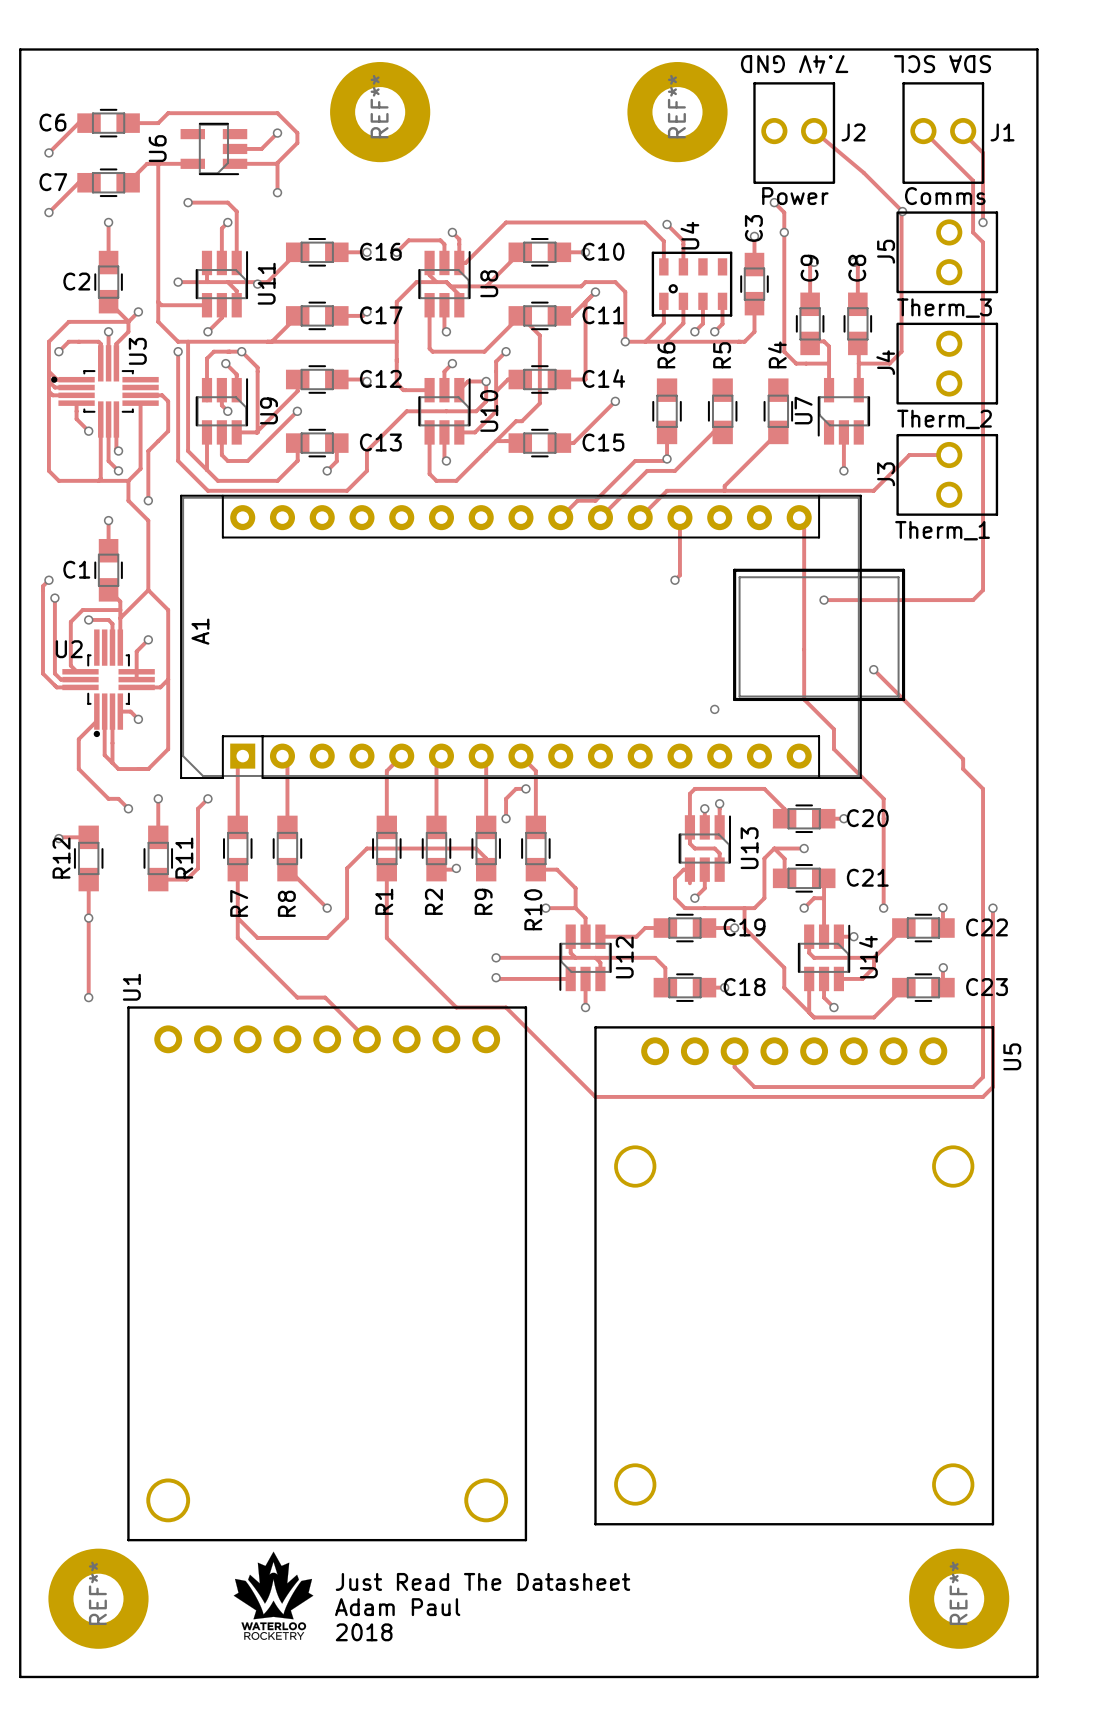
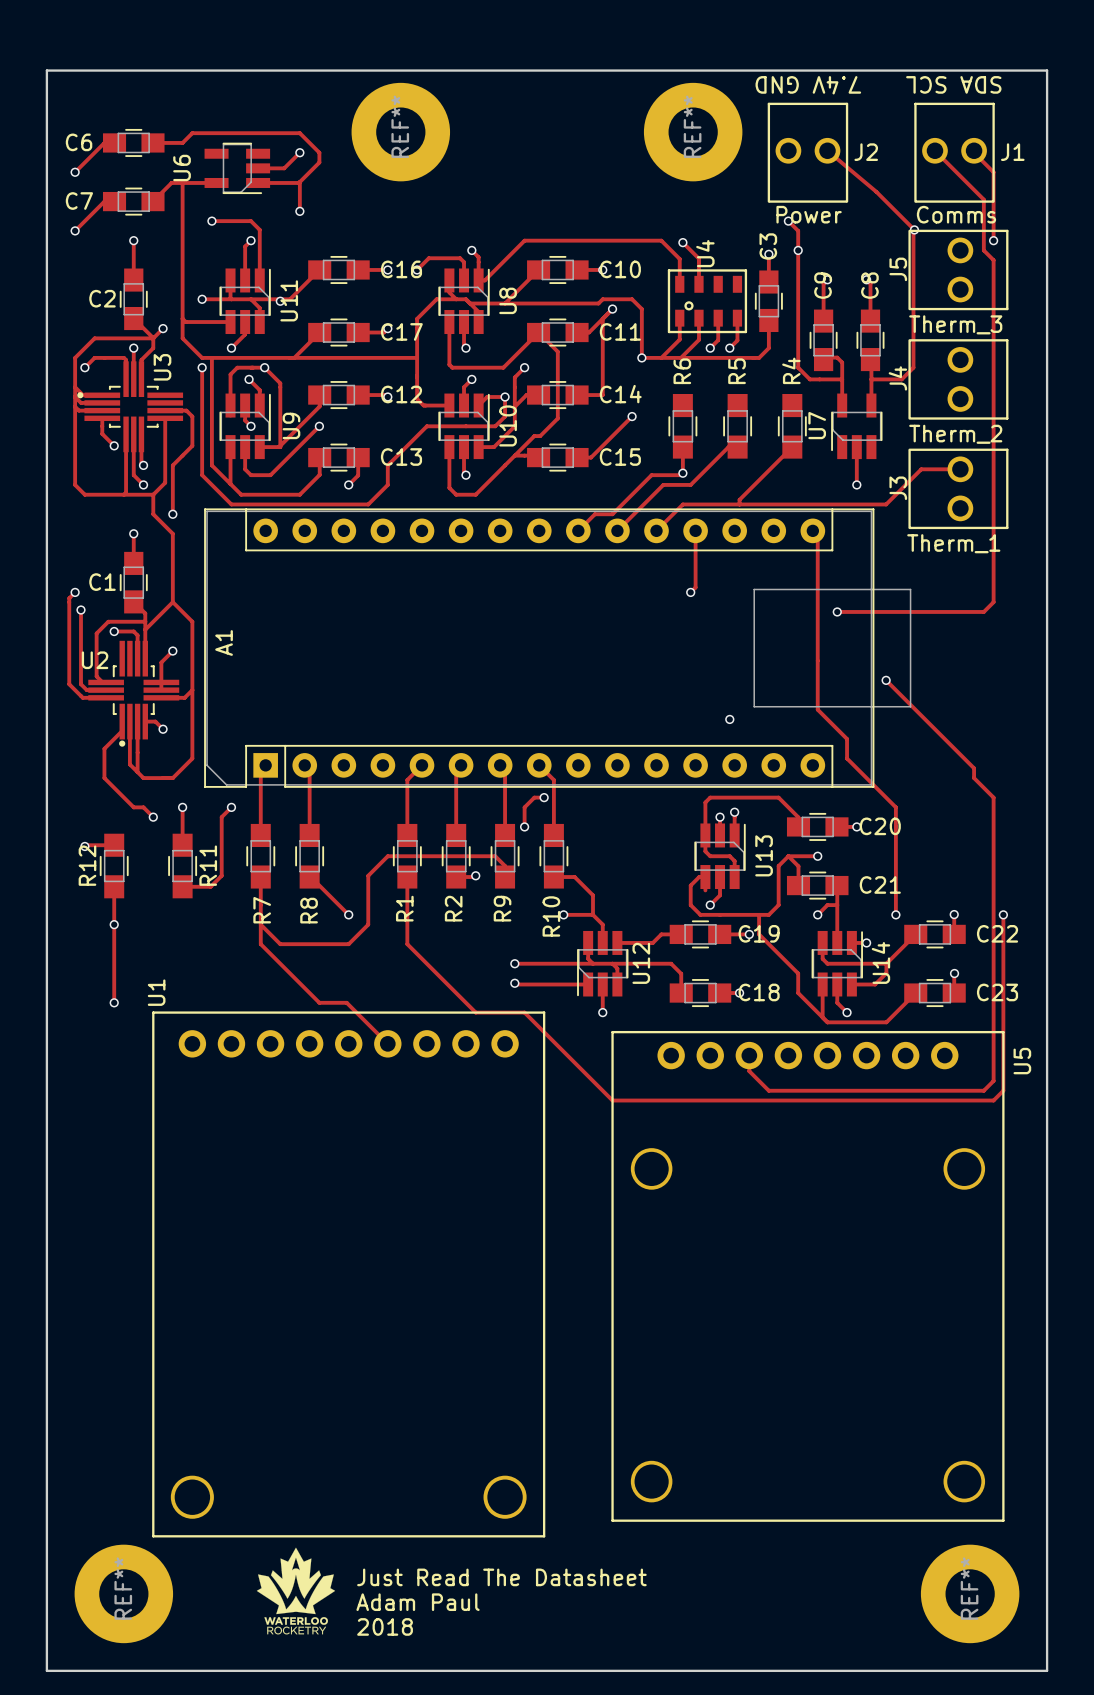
line: (734, 570) (734, 699) (903, 699) (903, 570) (734, 570) -> none

